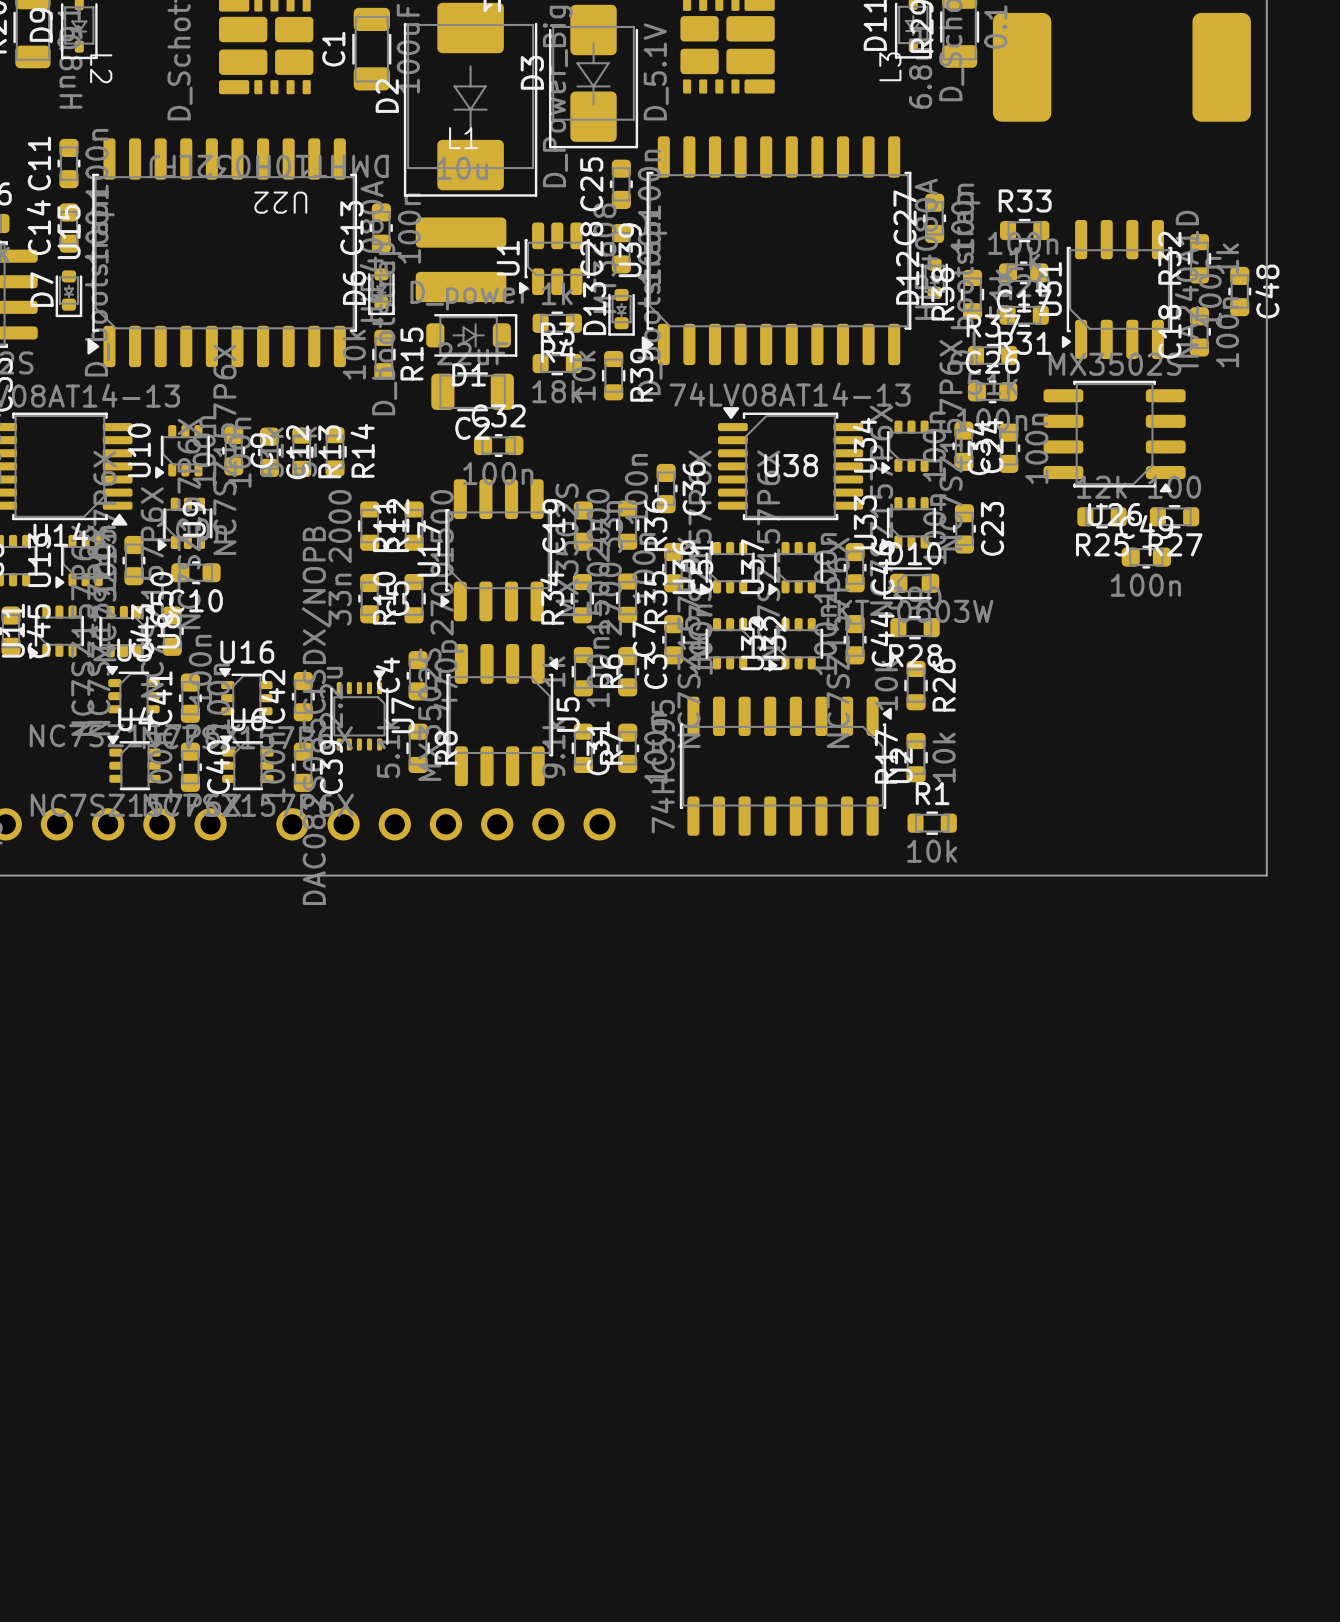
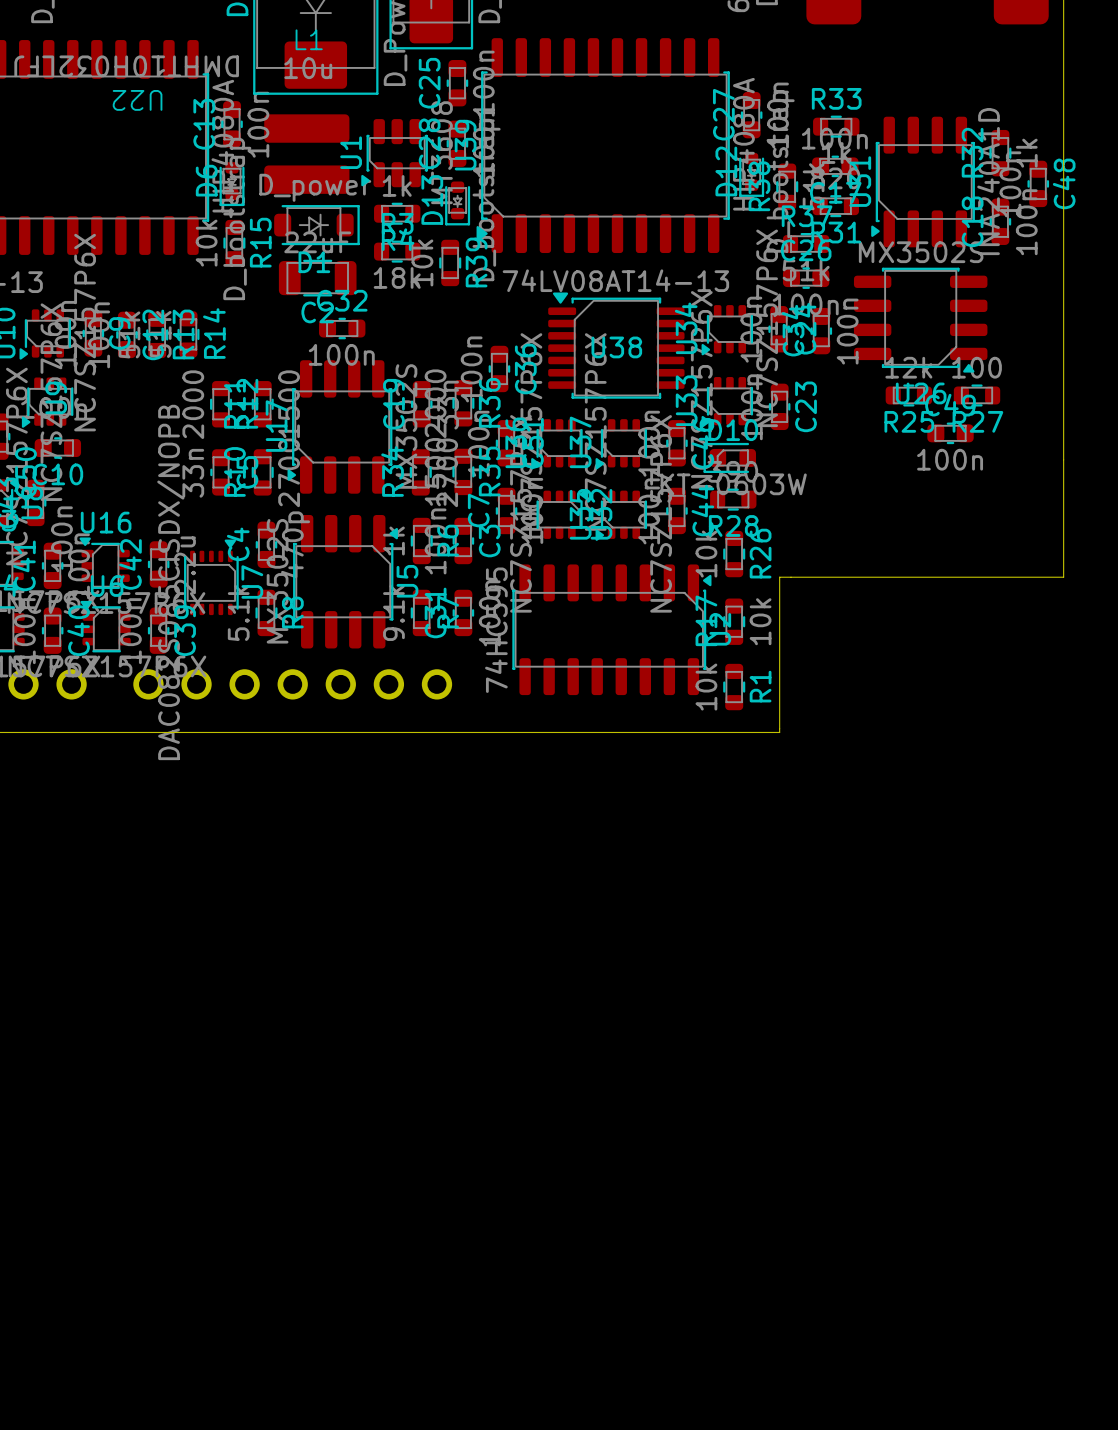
board edge: (1266, 710) (1266, 875) (964, 875) -> (1063, 577) (779, 577) (779, 732)
R1 rotation: 0° (932, 823) -> 90° clockwise (734, 687)

